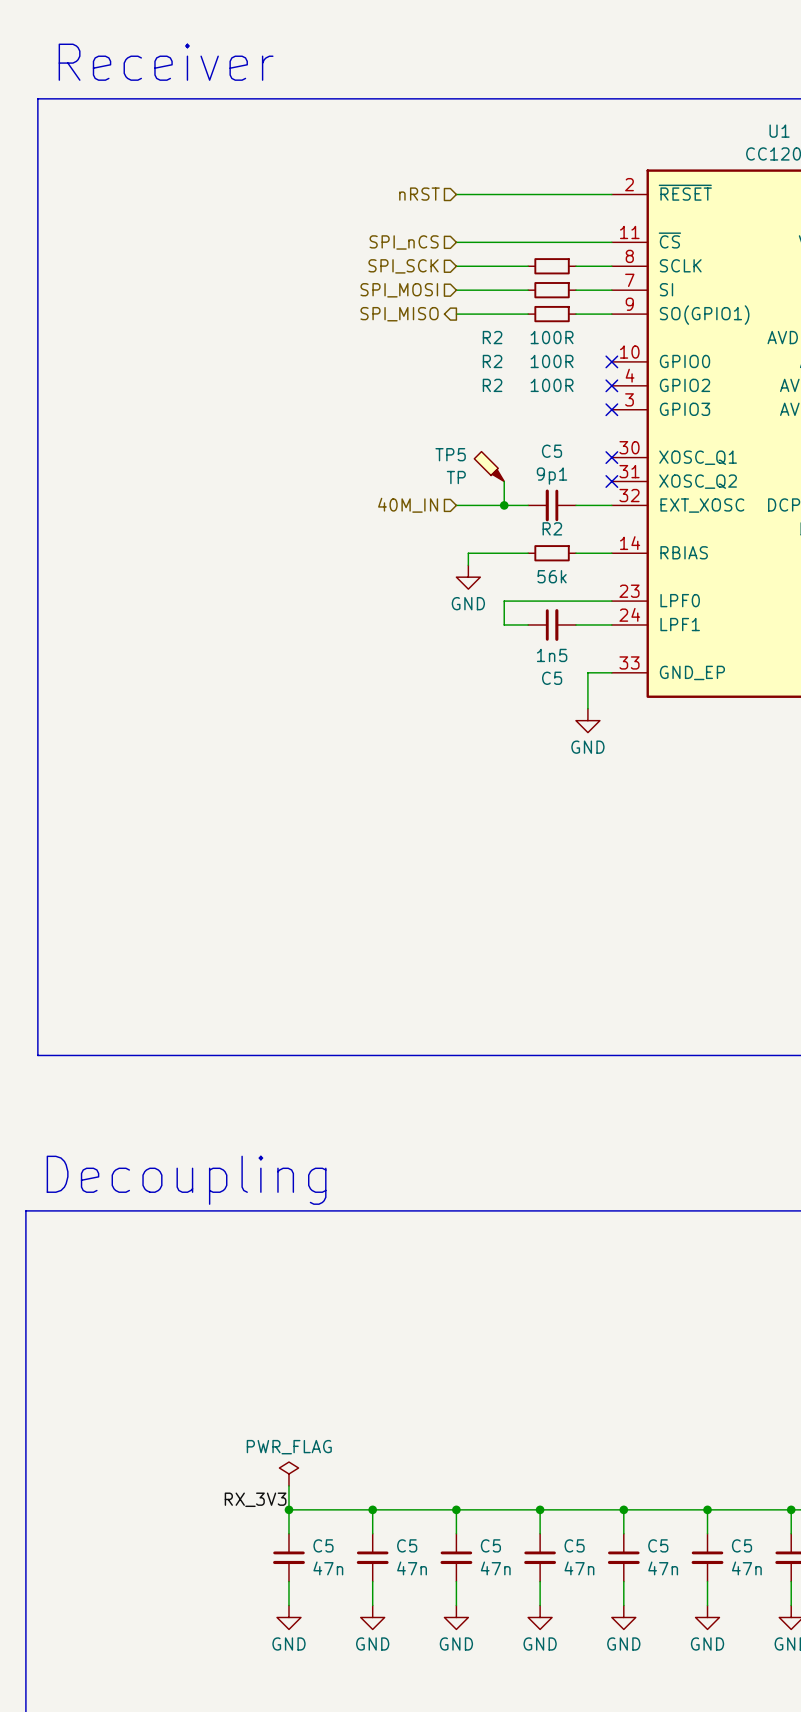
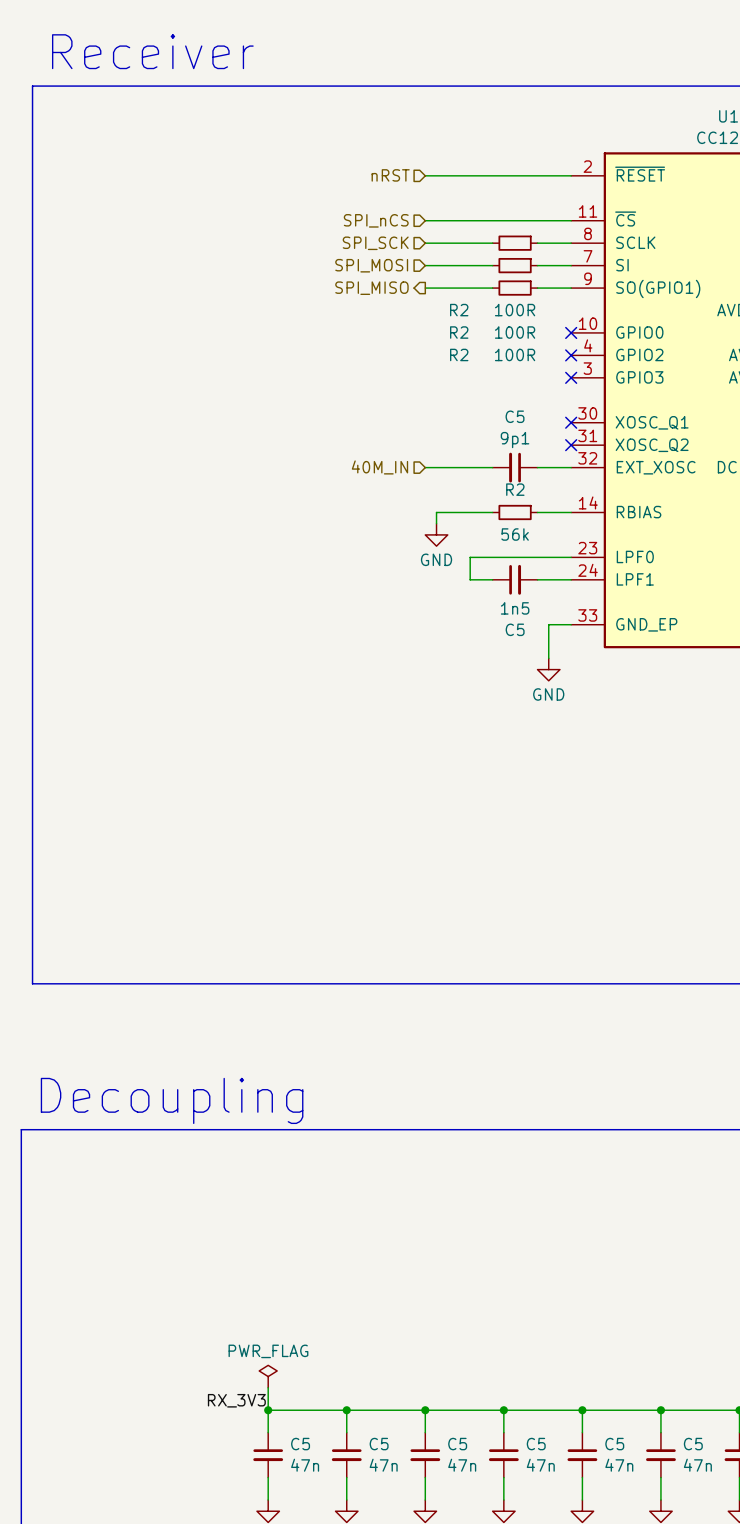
TP5: TP (489, 466) -> none
wire: (504, 481) (504, 505) -> none
junction: (504, 505) -> none

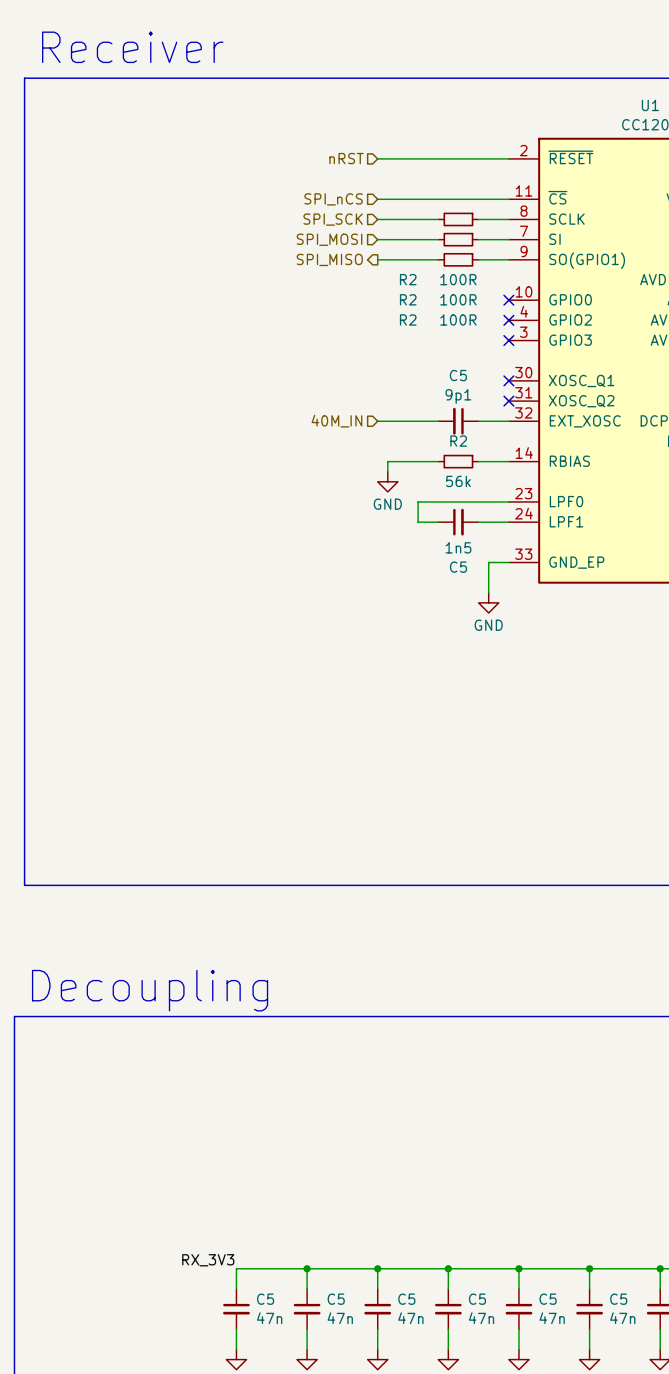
power symbol: PWR_FLAG (268, 1376) -> none
wire: (268, 1387) (268, 1410) -> none
junction: (268, 1410) -> none

